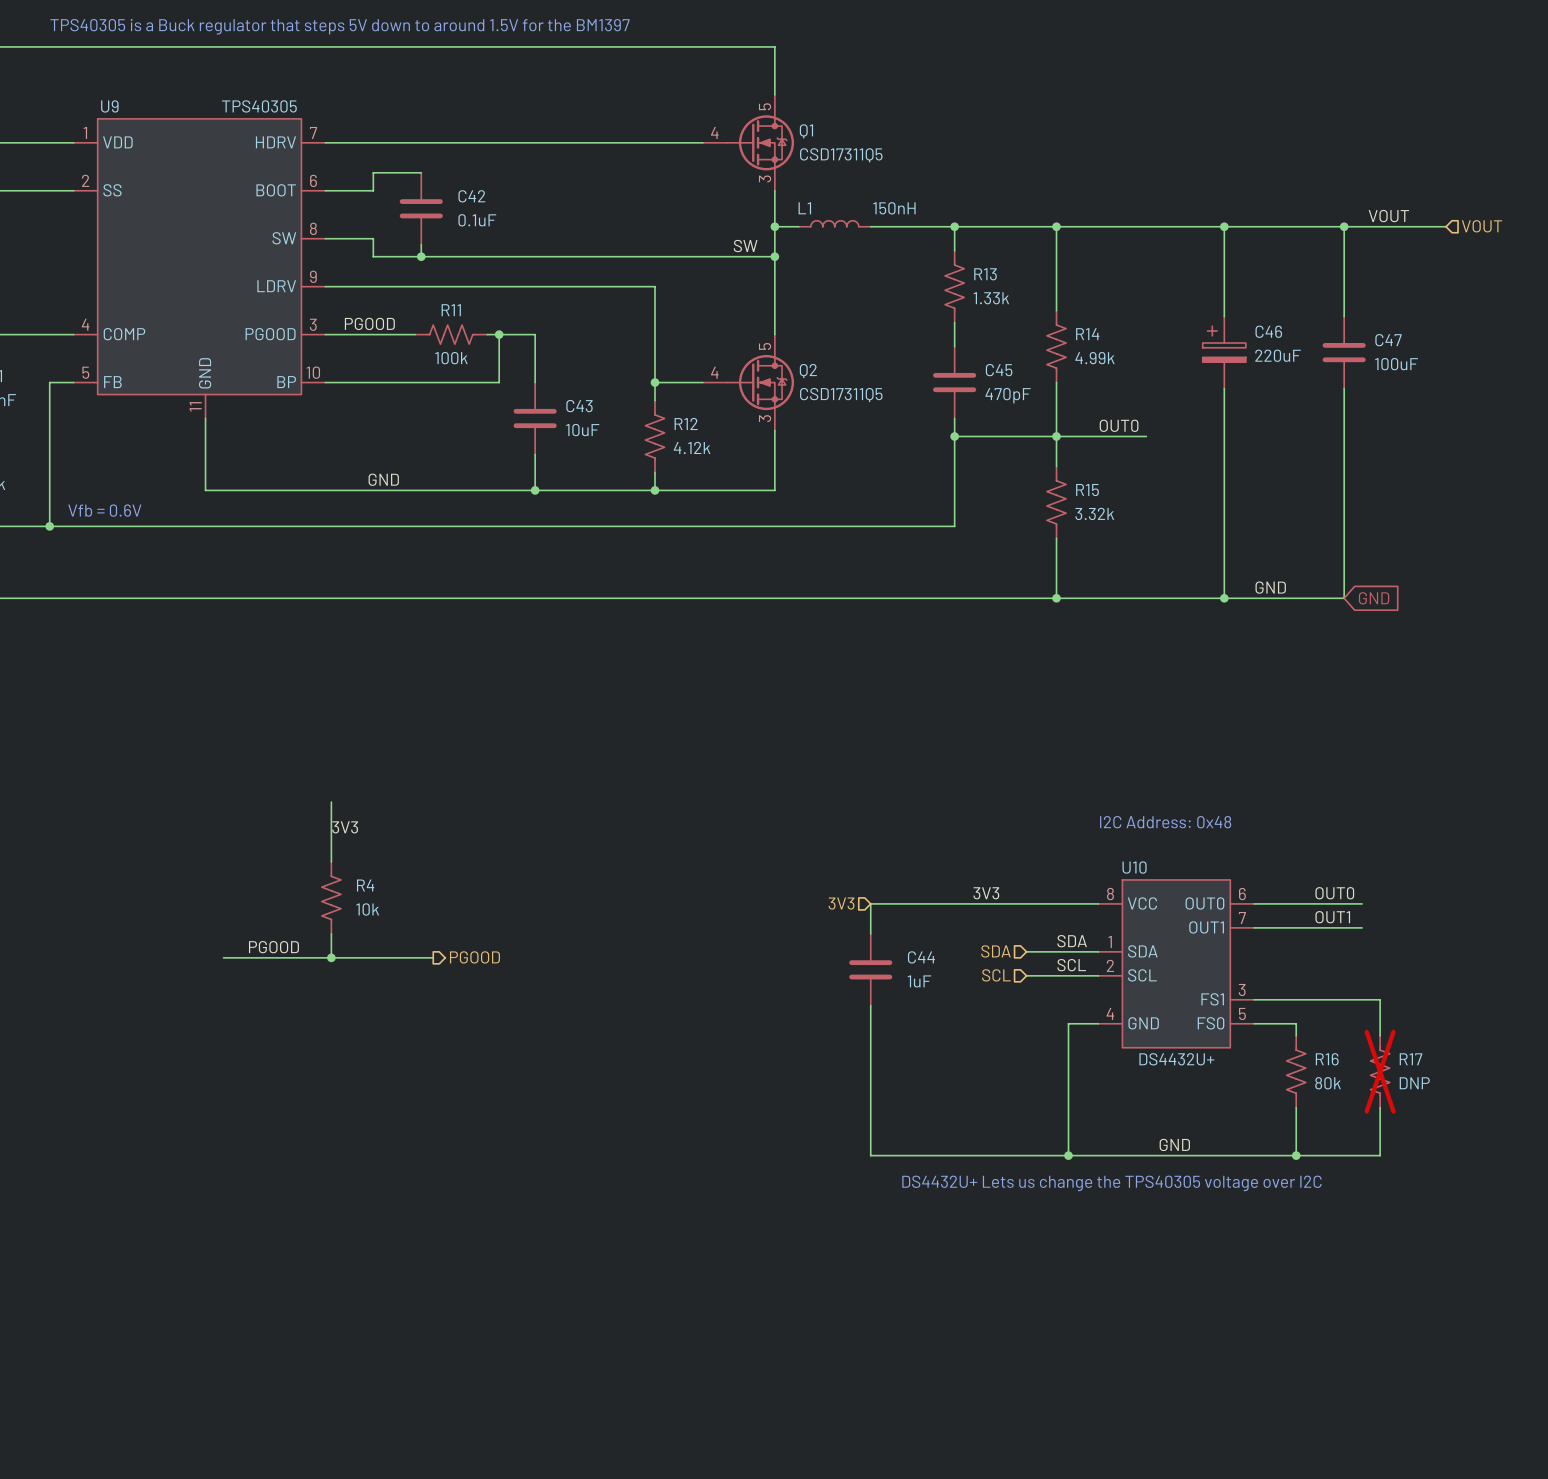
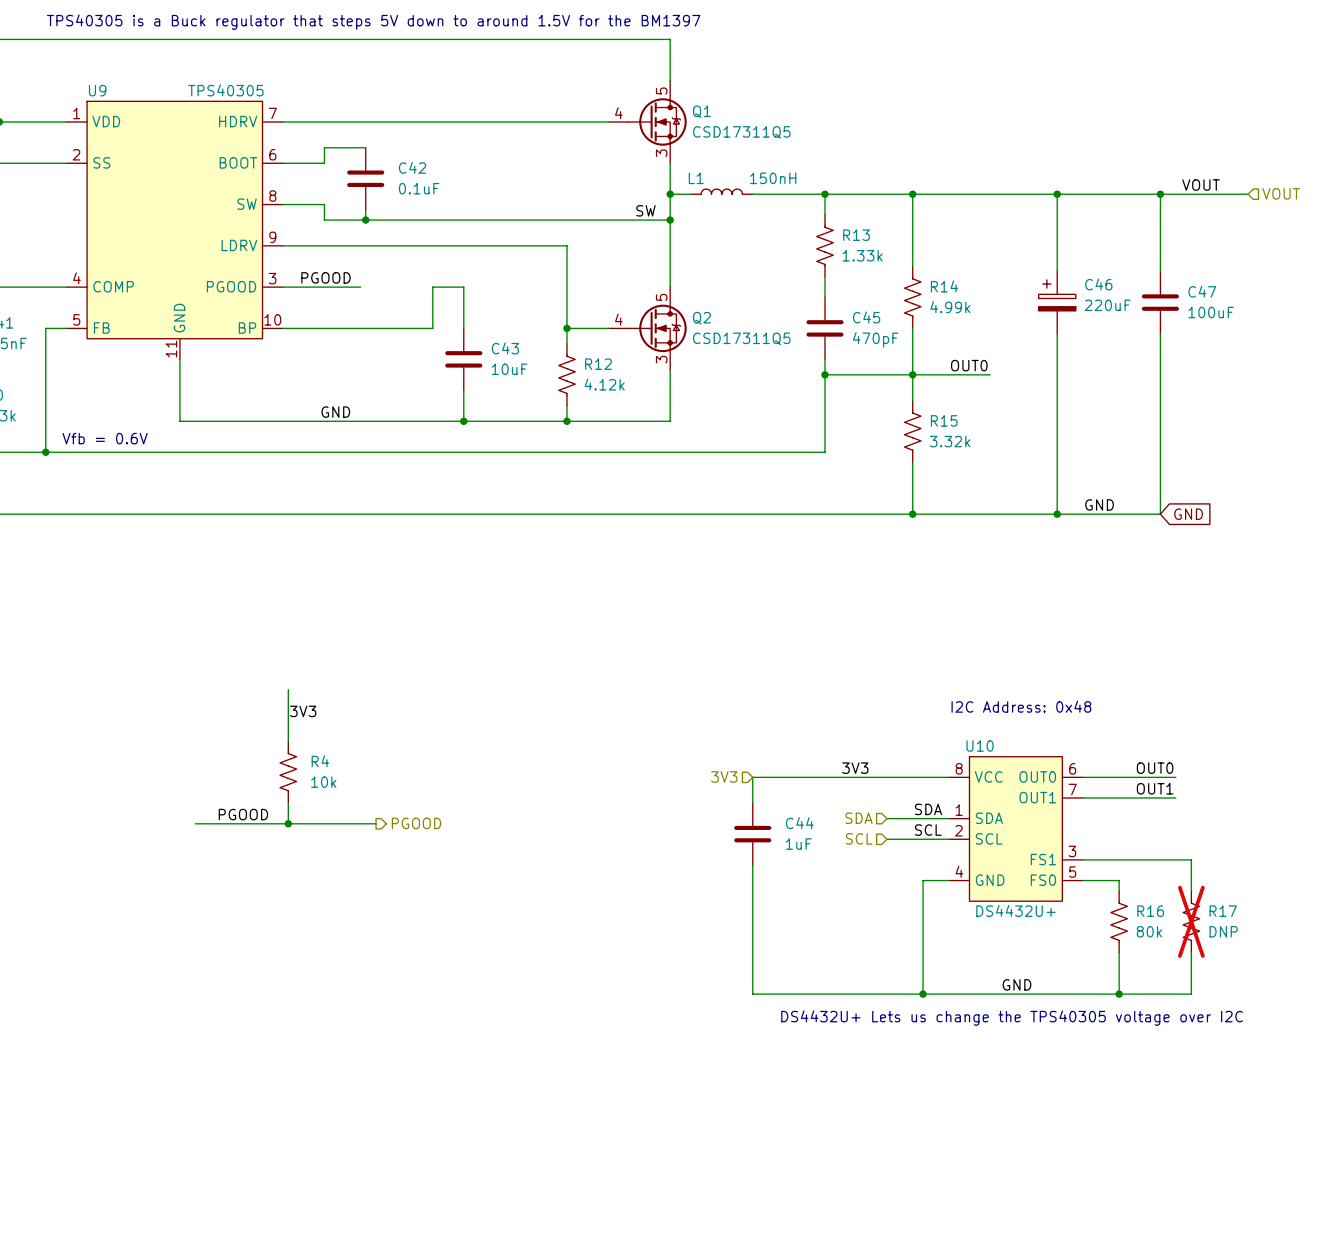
R11: 100k (451, 334) -> none
wire: (487, 334) (499, 334) -> none
junction: (499, 334) -> none

